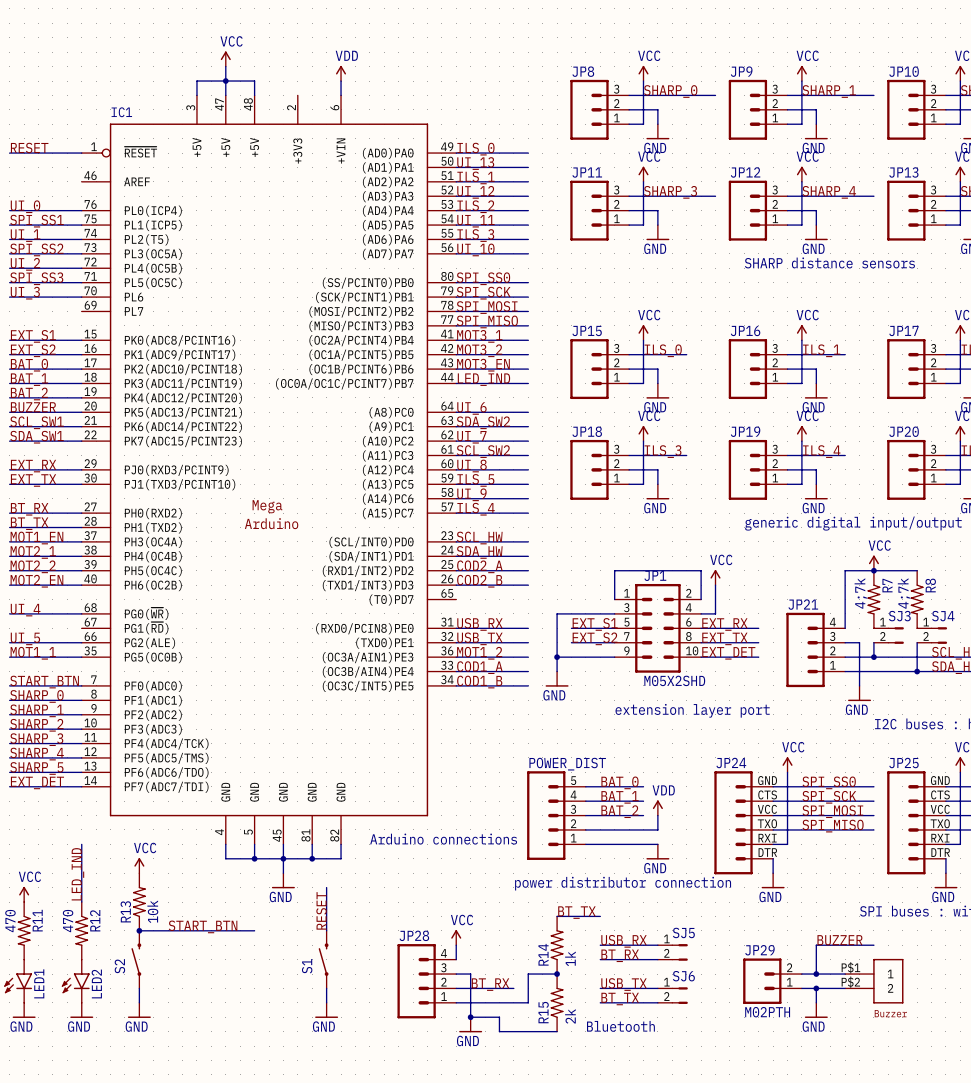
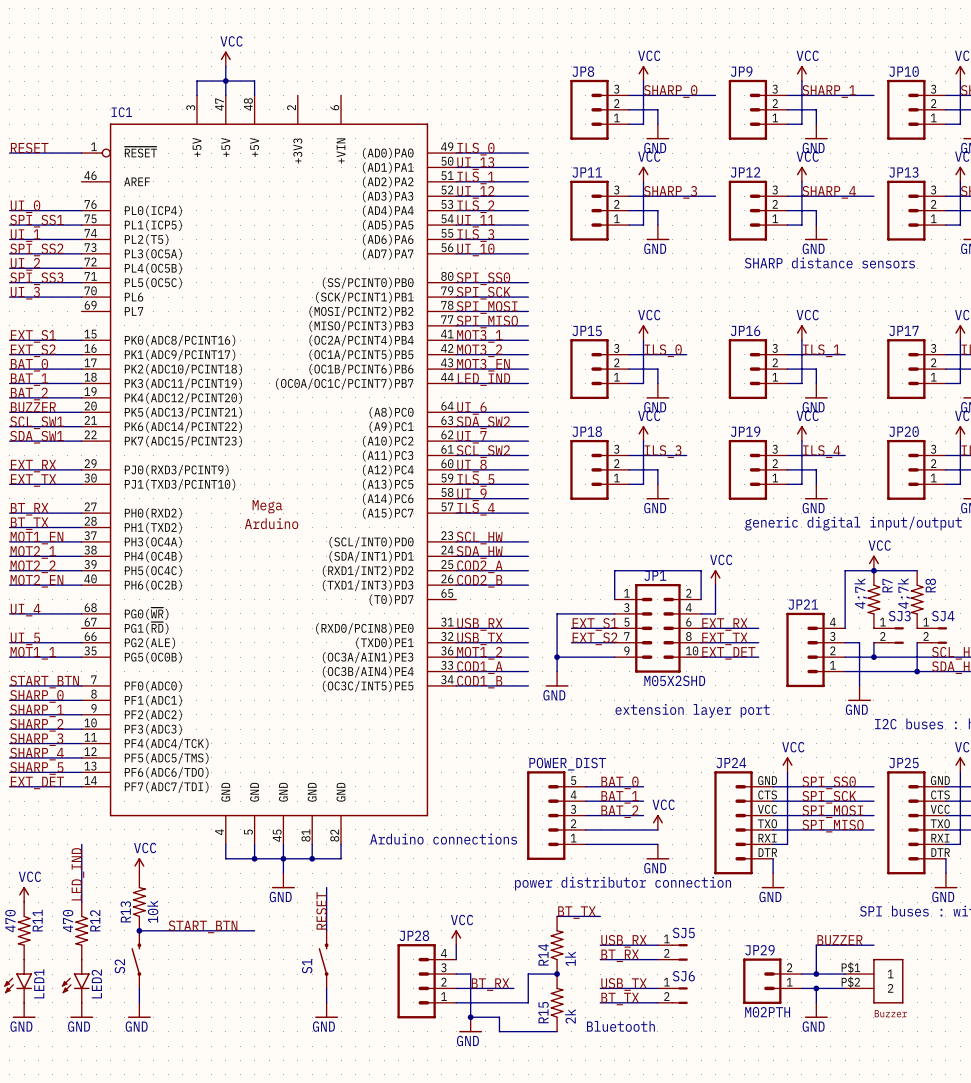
power symbol: VDD (341, 73) -> none
wire: (341, 81) (341, 95) -> none
power symbol: VDD (657, 808) -> none
power symbol: none -> VCC (657, 822)

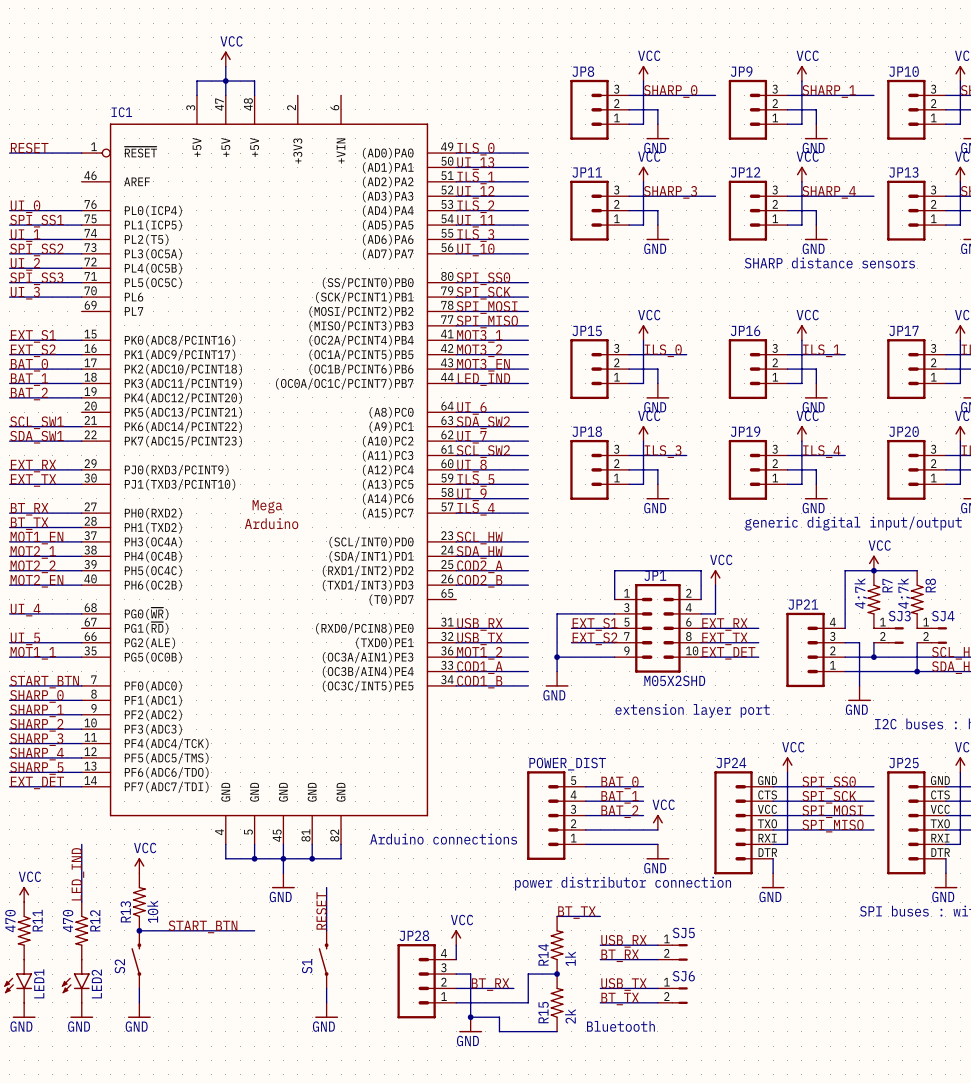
label: BUZZER (33, 407) -> none
wire: (9, 412) (81, 412) -> none
label: BUZZER (839, 940) -> none
wire: (873, 945) (816, 945) (816, 974) -> none
wire: (801, 974) (845, 974) -> none
junction: (816, 974) -> none
JP29: M02PTH (772, 981) -> none
part: (874, 981) -> none
wire: (801, 988) (845, 988) -> none
wire: (816, 988) (816, 1002) -> none
junction: (816, 988) -> none
power symbol: GND (816, 1010) -> none

